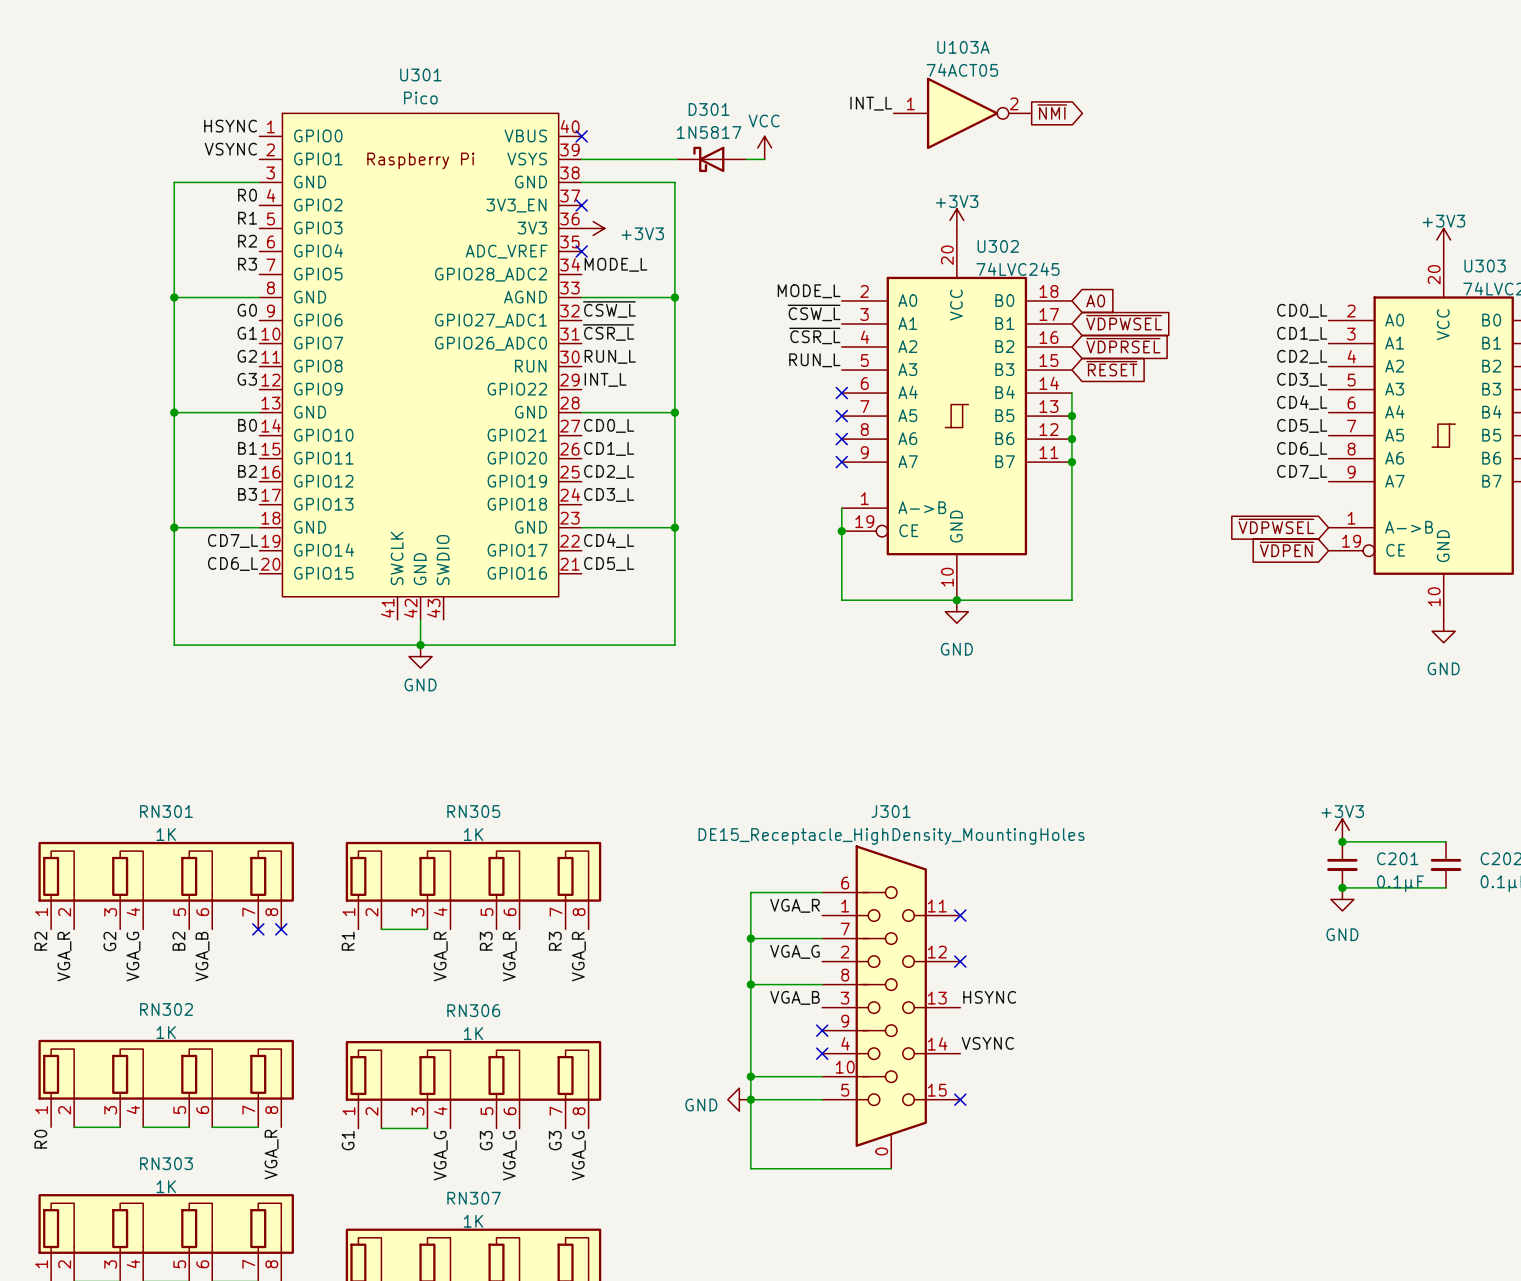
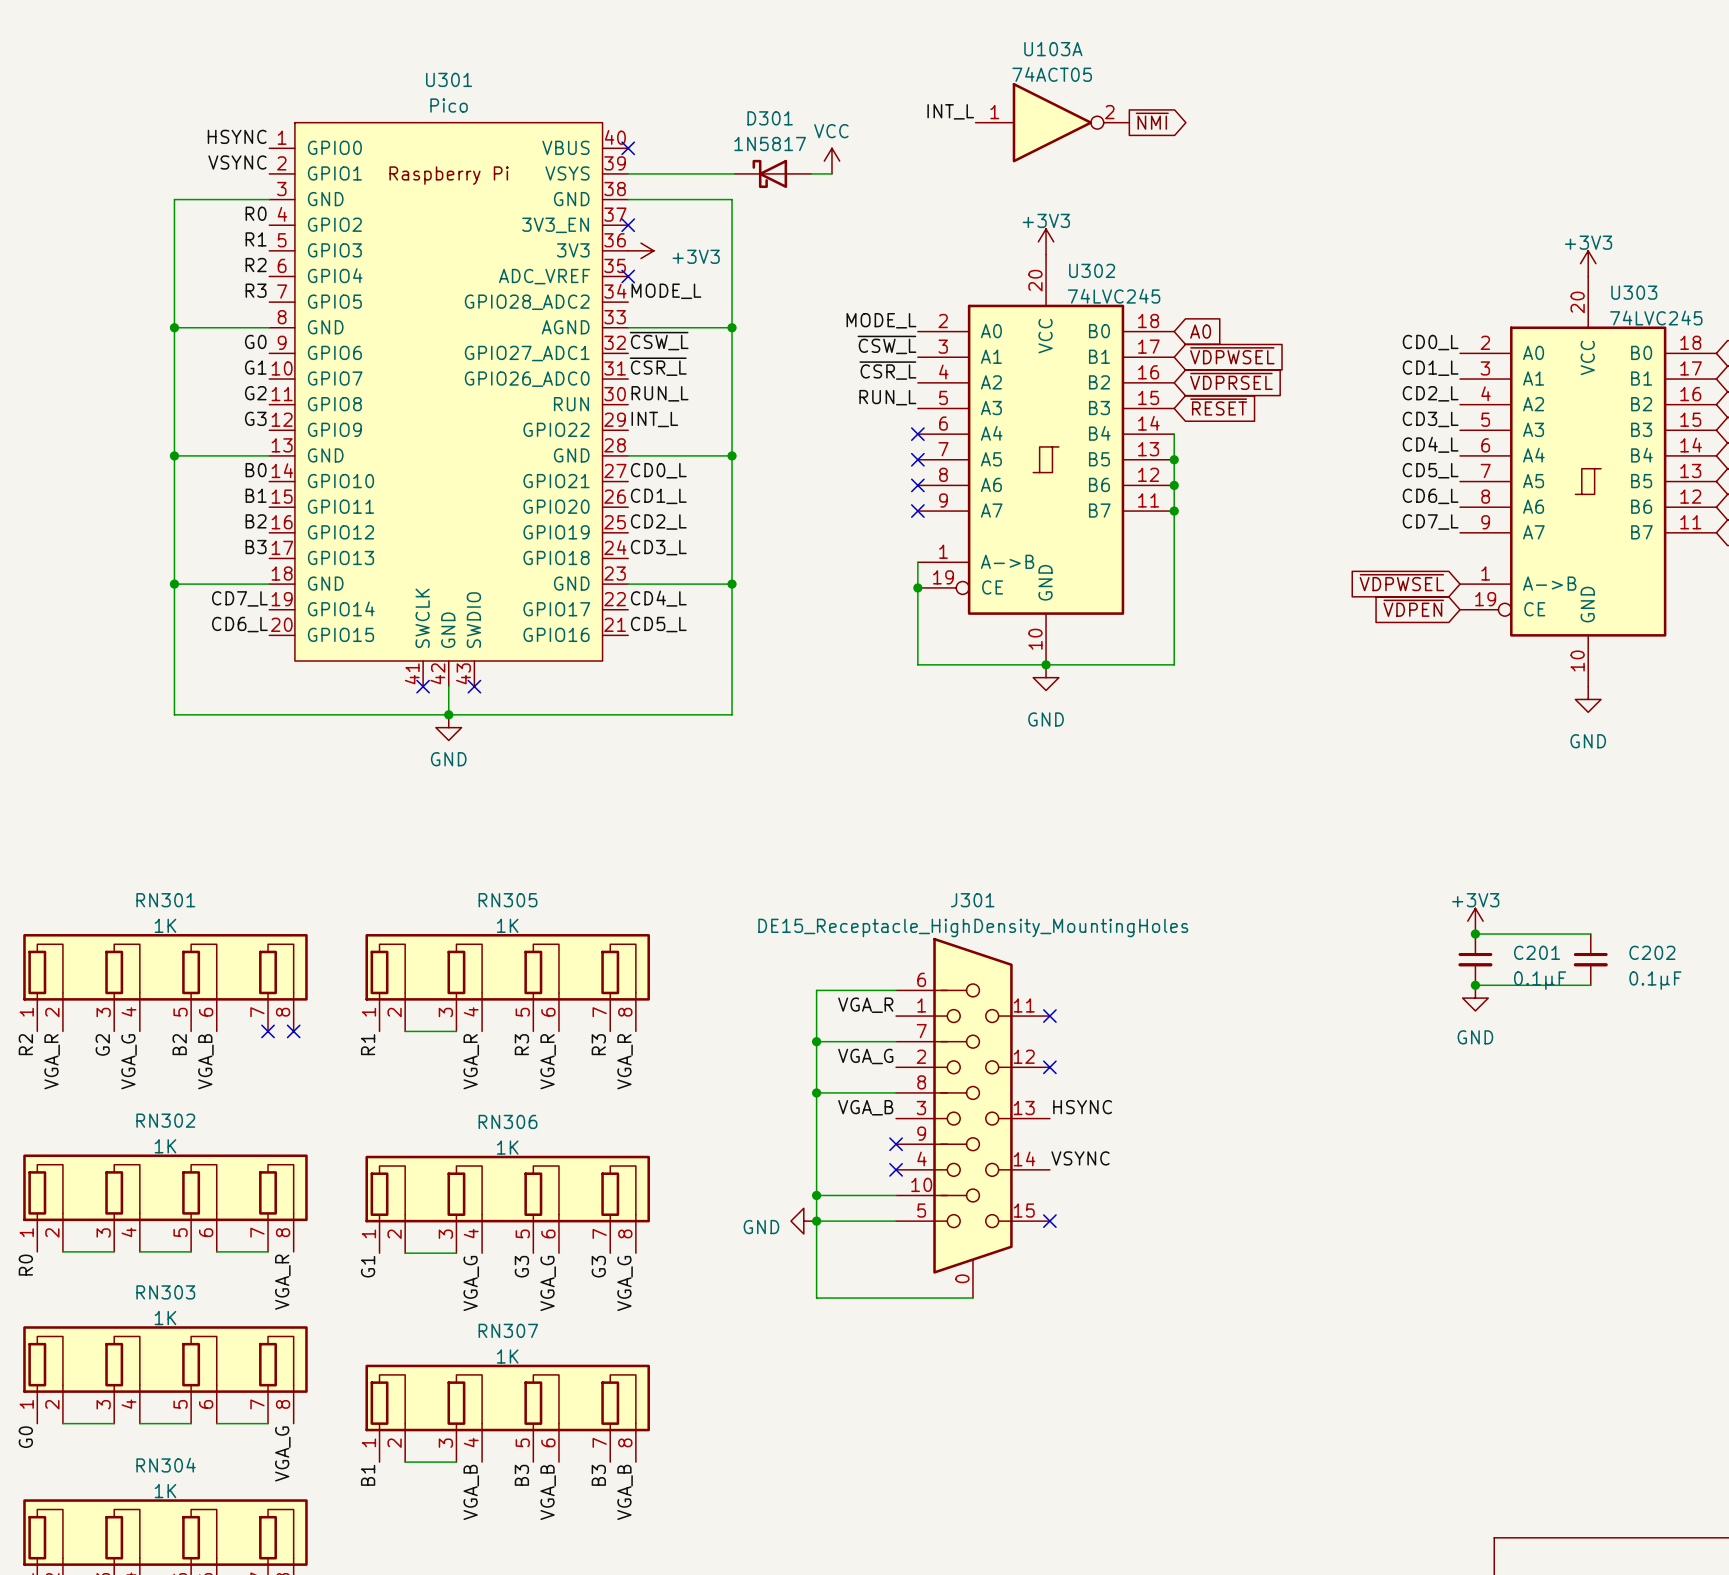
no-connect mark: none -> (423, 686)
no-connect mark: none -> (474, 686)

